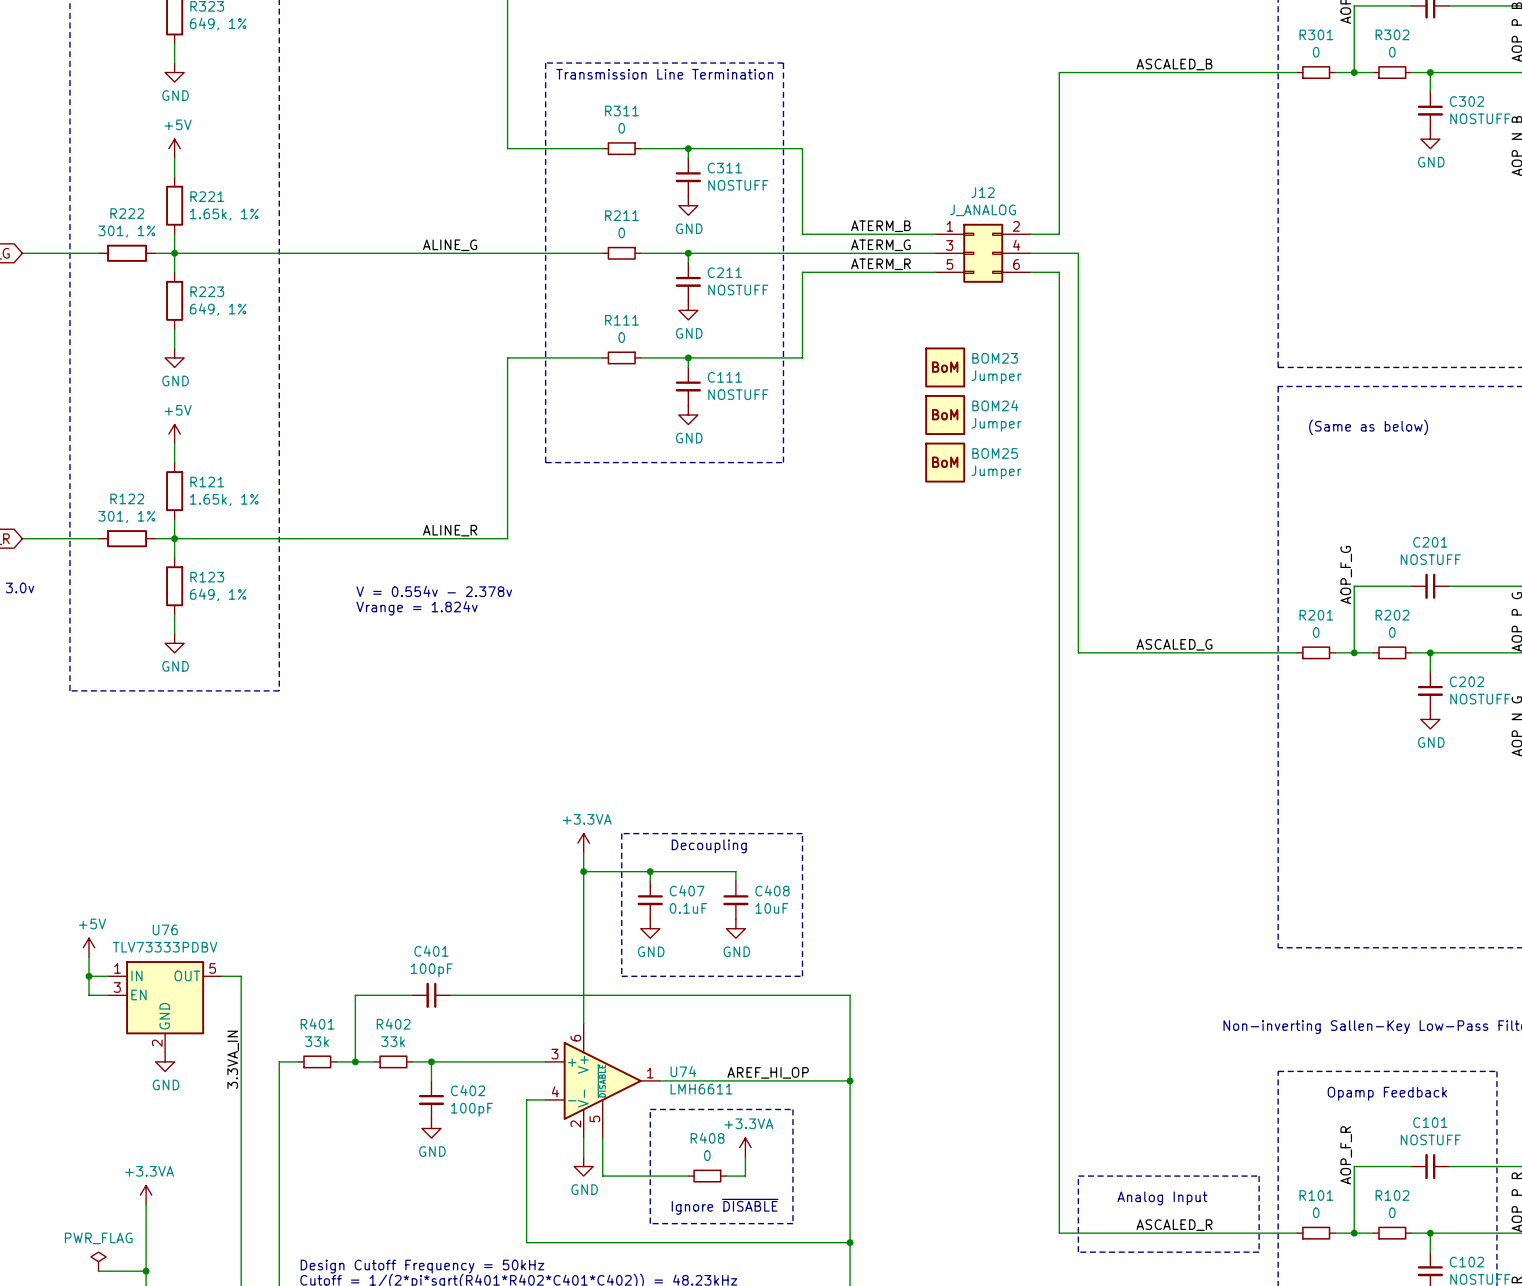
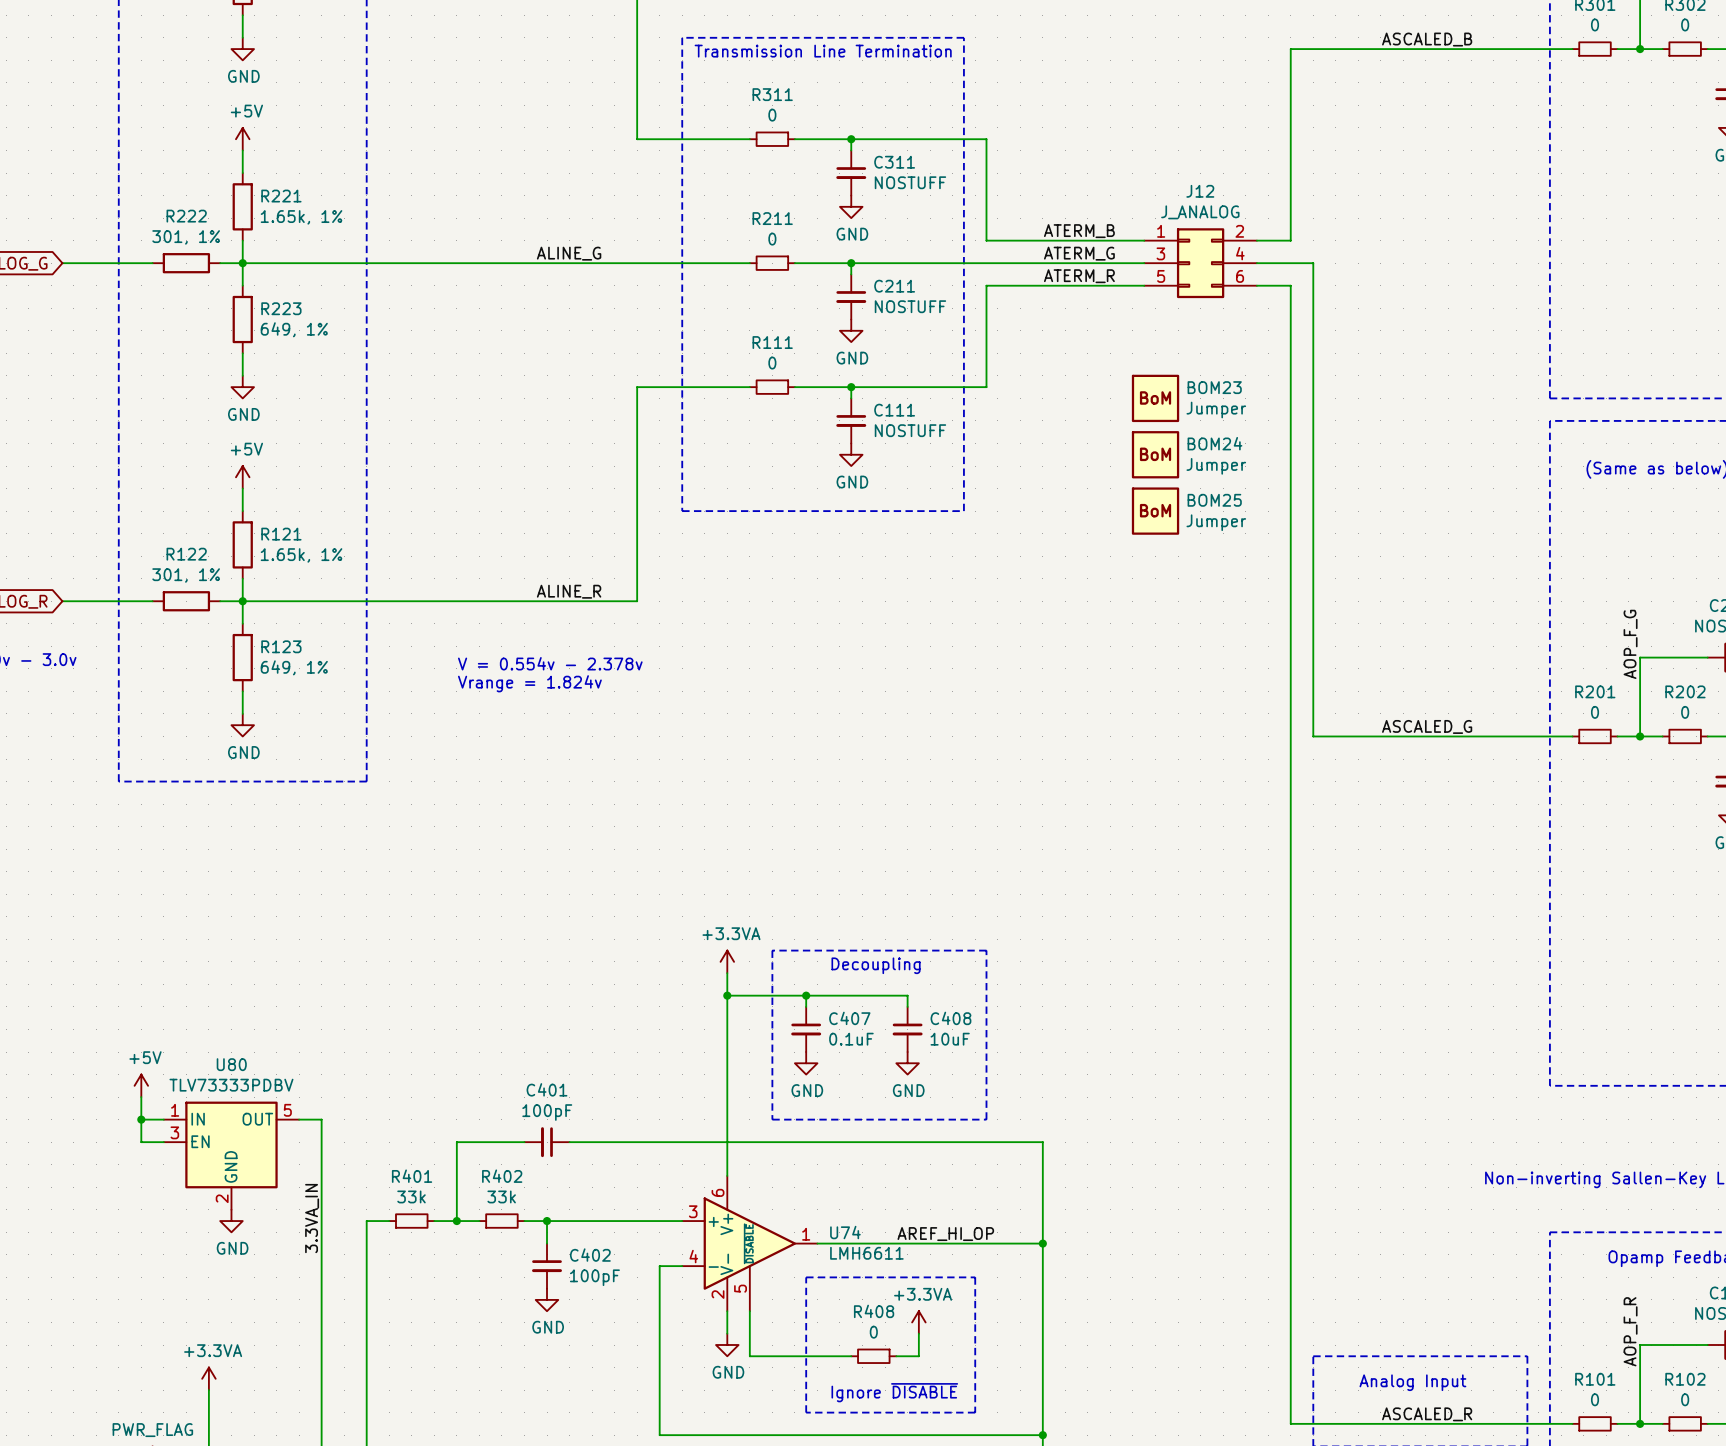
U76 name: U76 (165, 929) -> U80 (231, 1064)

